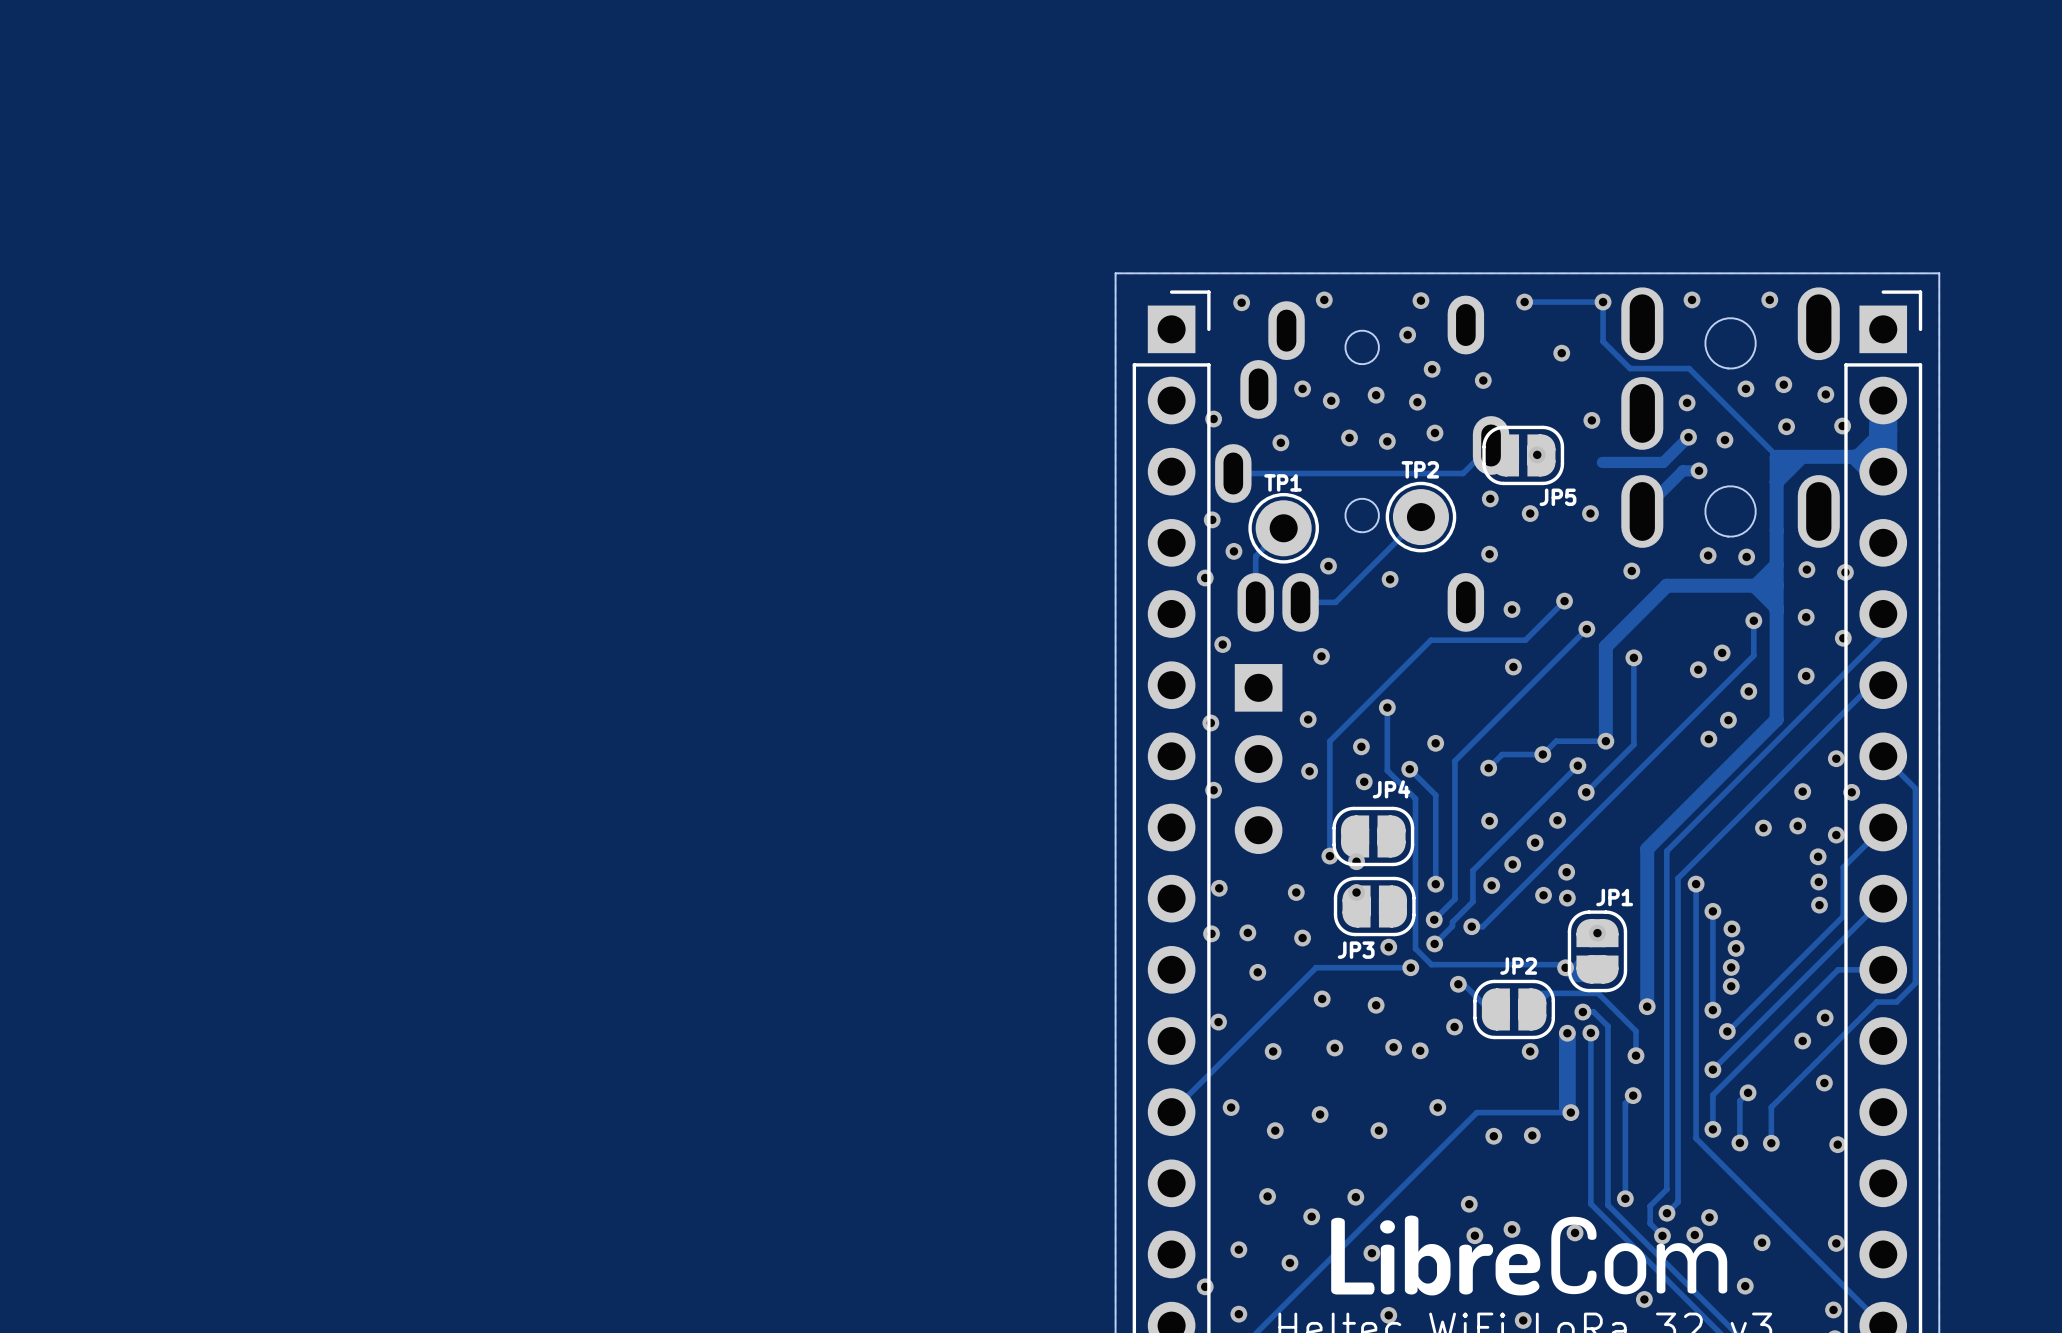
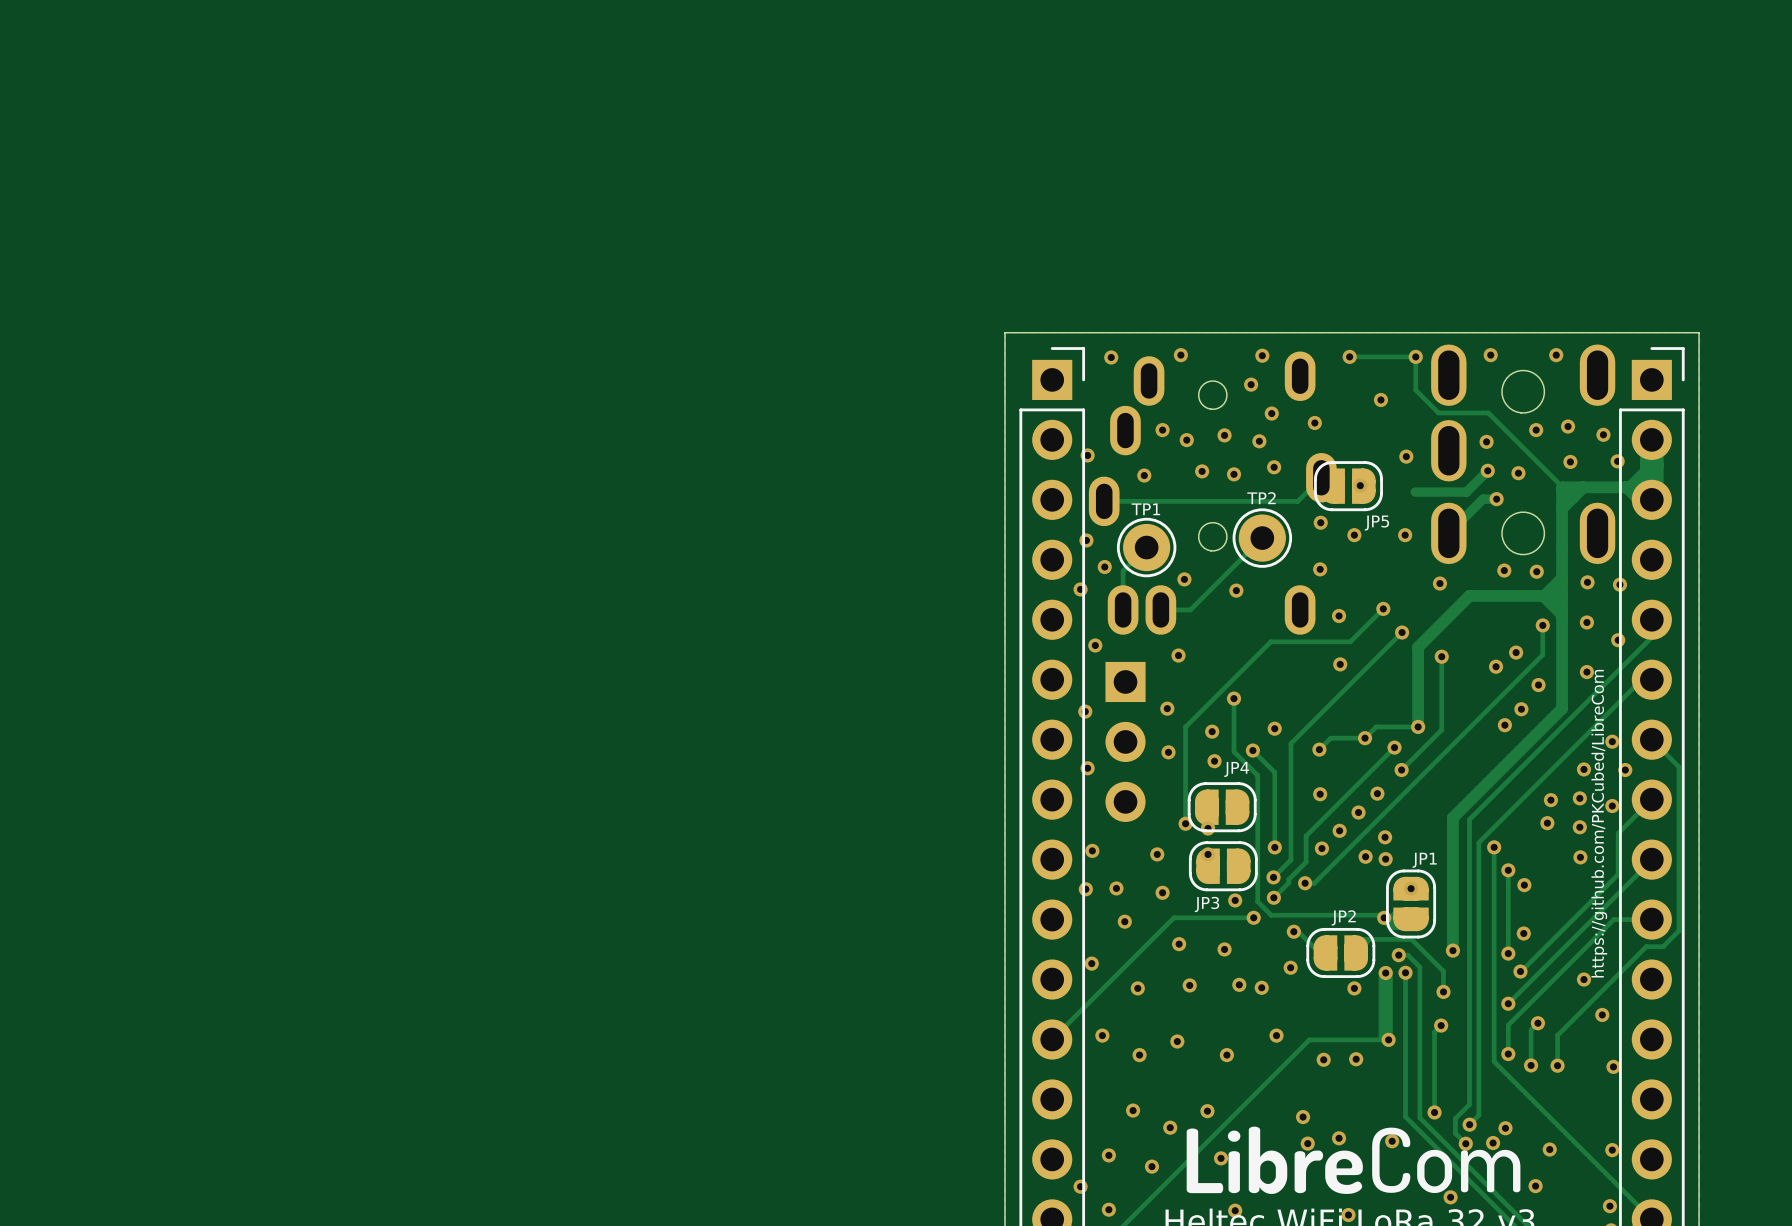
text: none -> https://github.com/PKCubed/LibreCom (1599, 823)
via: none -> (1547, 823)
via: (1818, 856) -> none
via: none -> (1579, 827)
via: (1818, 882) -> none
via: none -> (1580, 857)
via: (1819, 905) -> none
via: (1736, 948) -> none
via: (1731, 967) -> none
via: (1825, 1017) -> none

